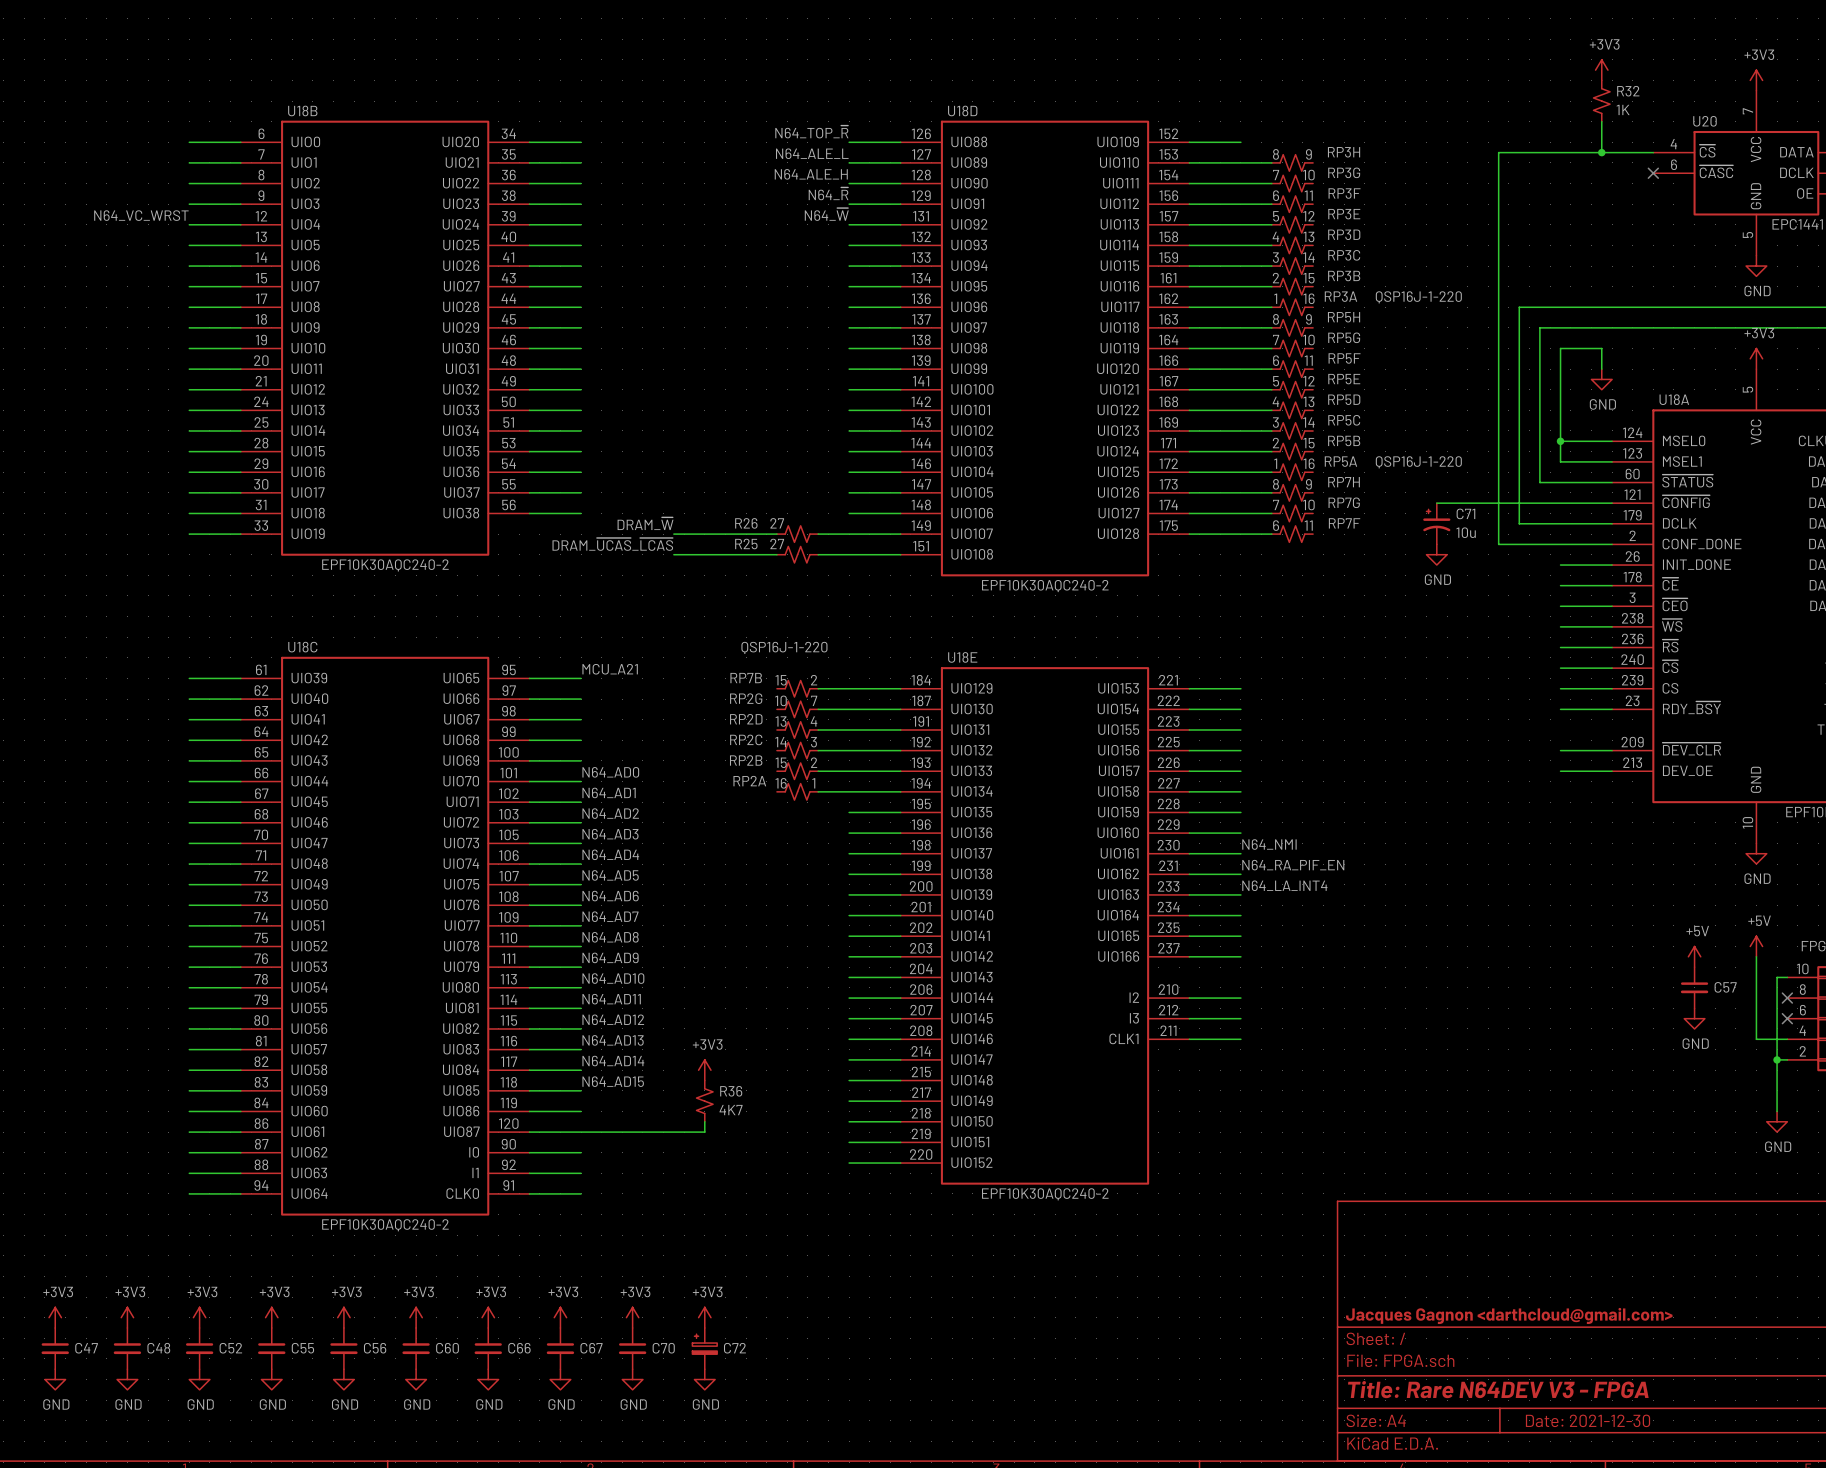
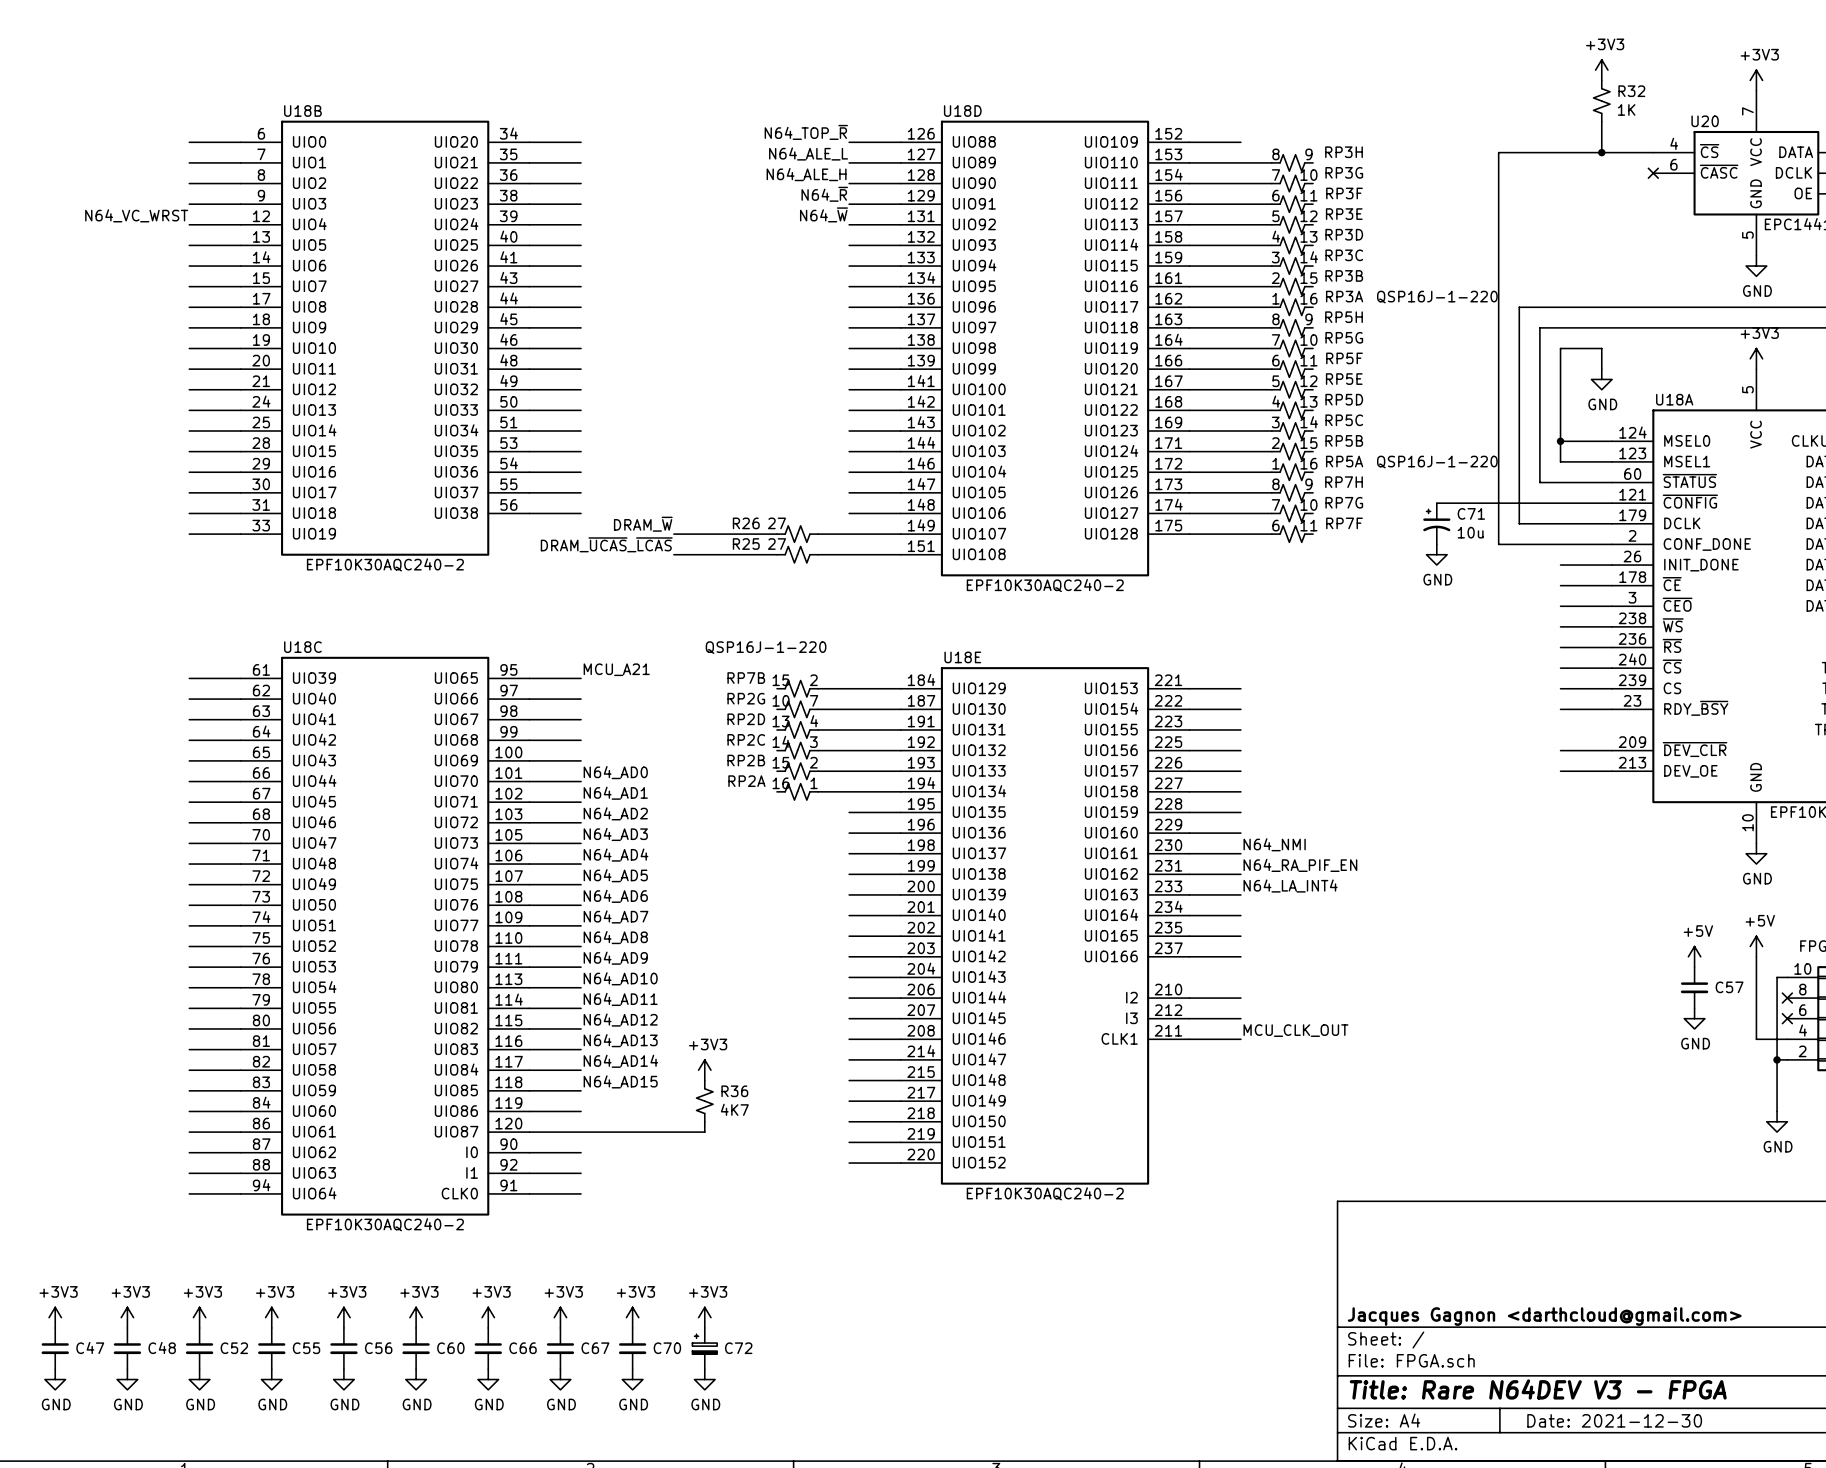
label: none -> MCU_CLK_OUT (1295, 1030)

